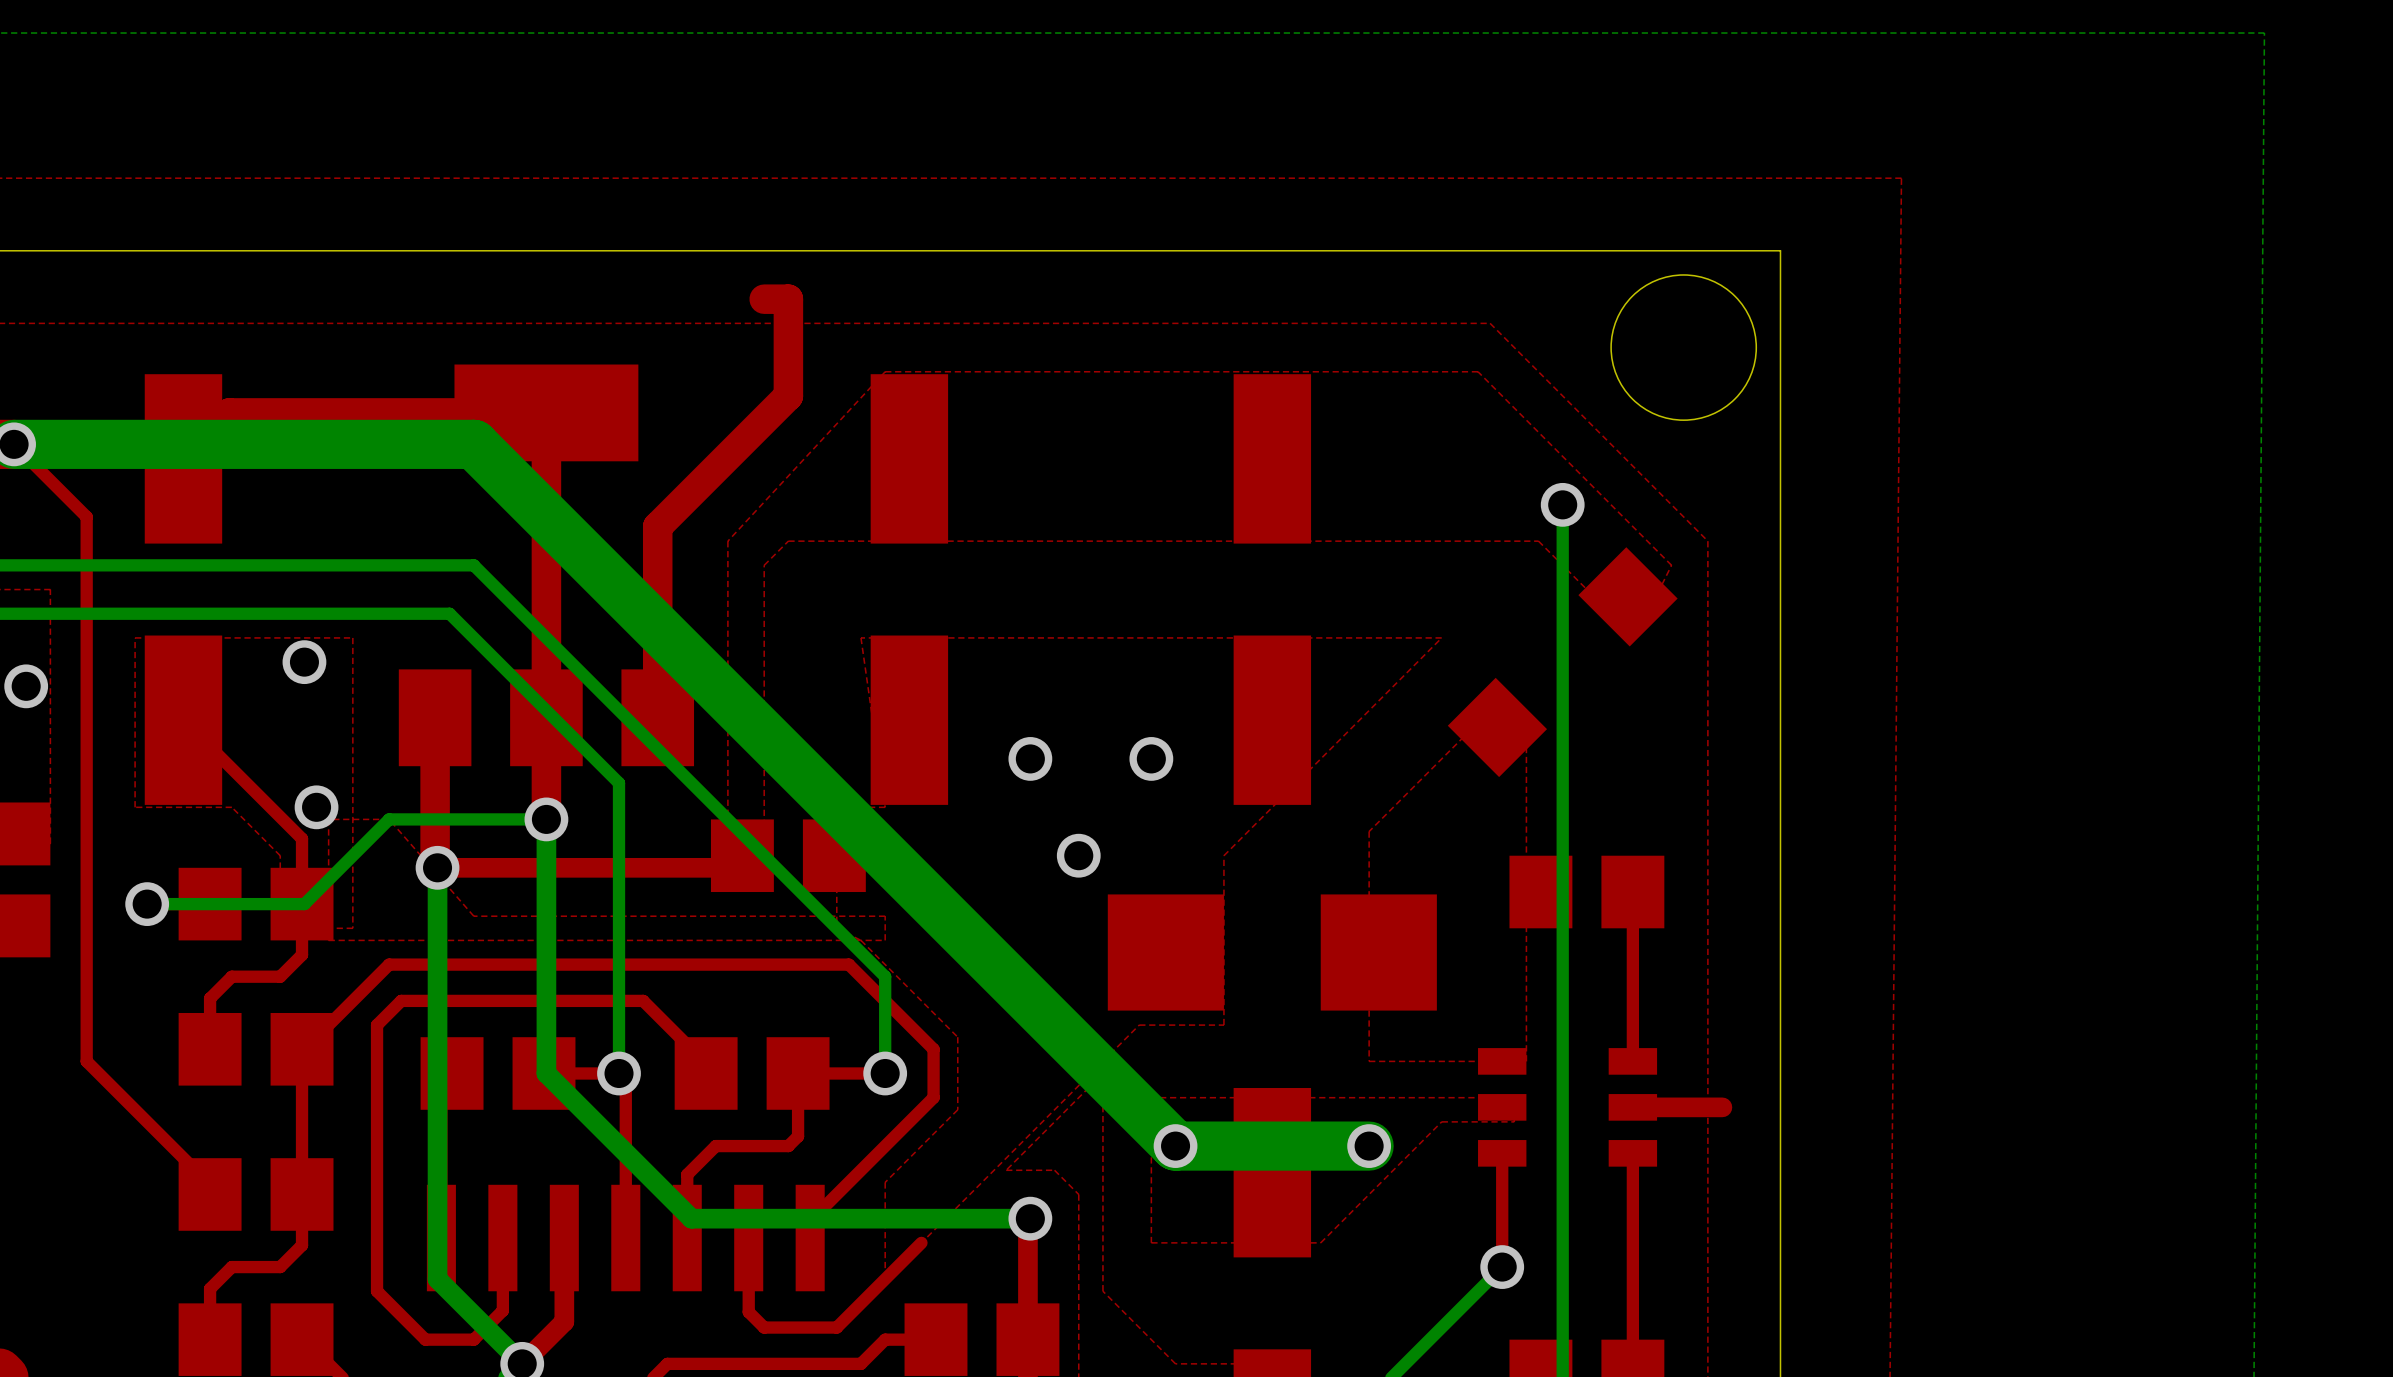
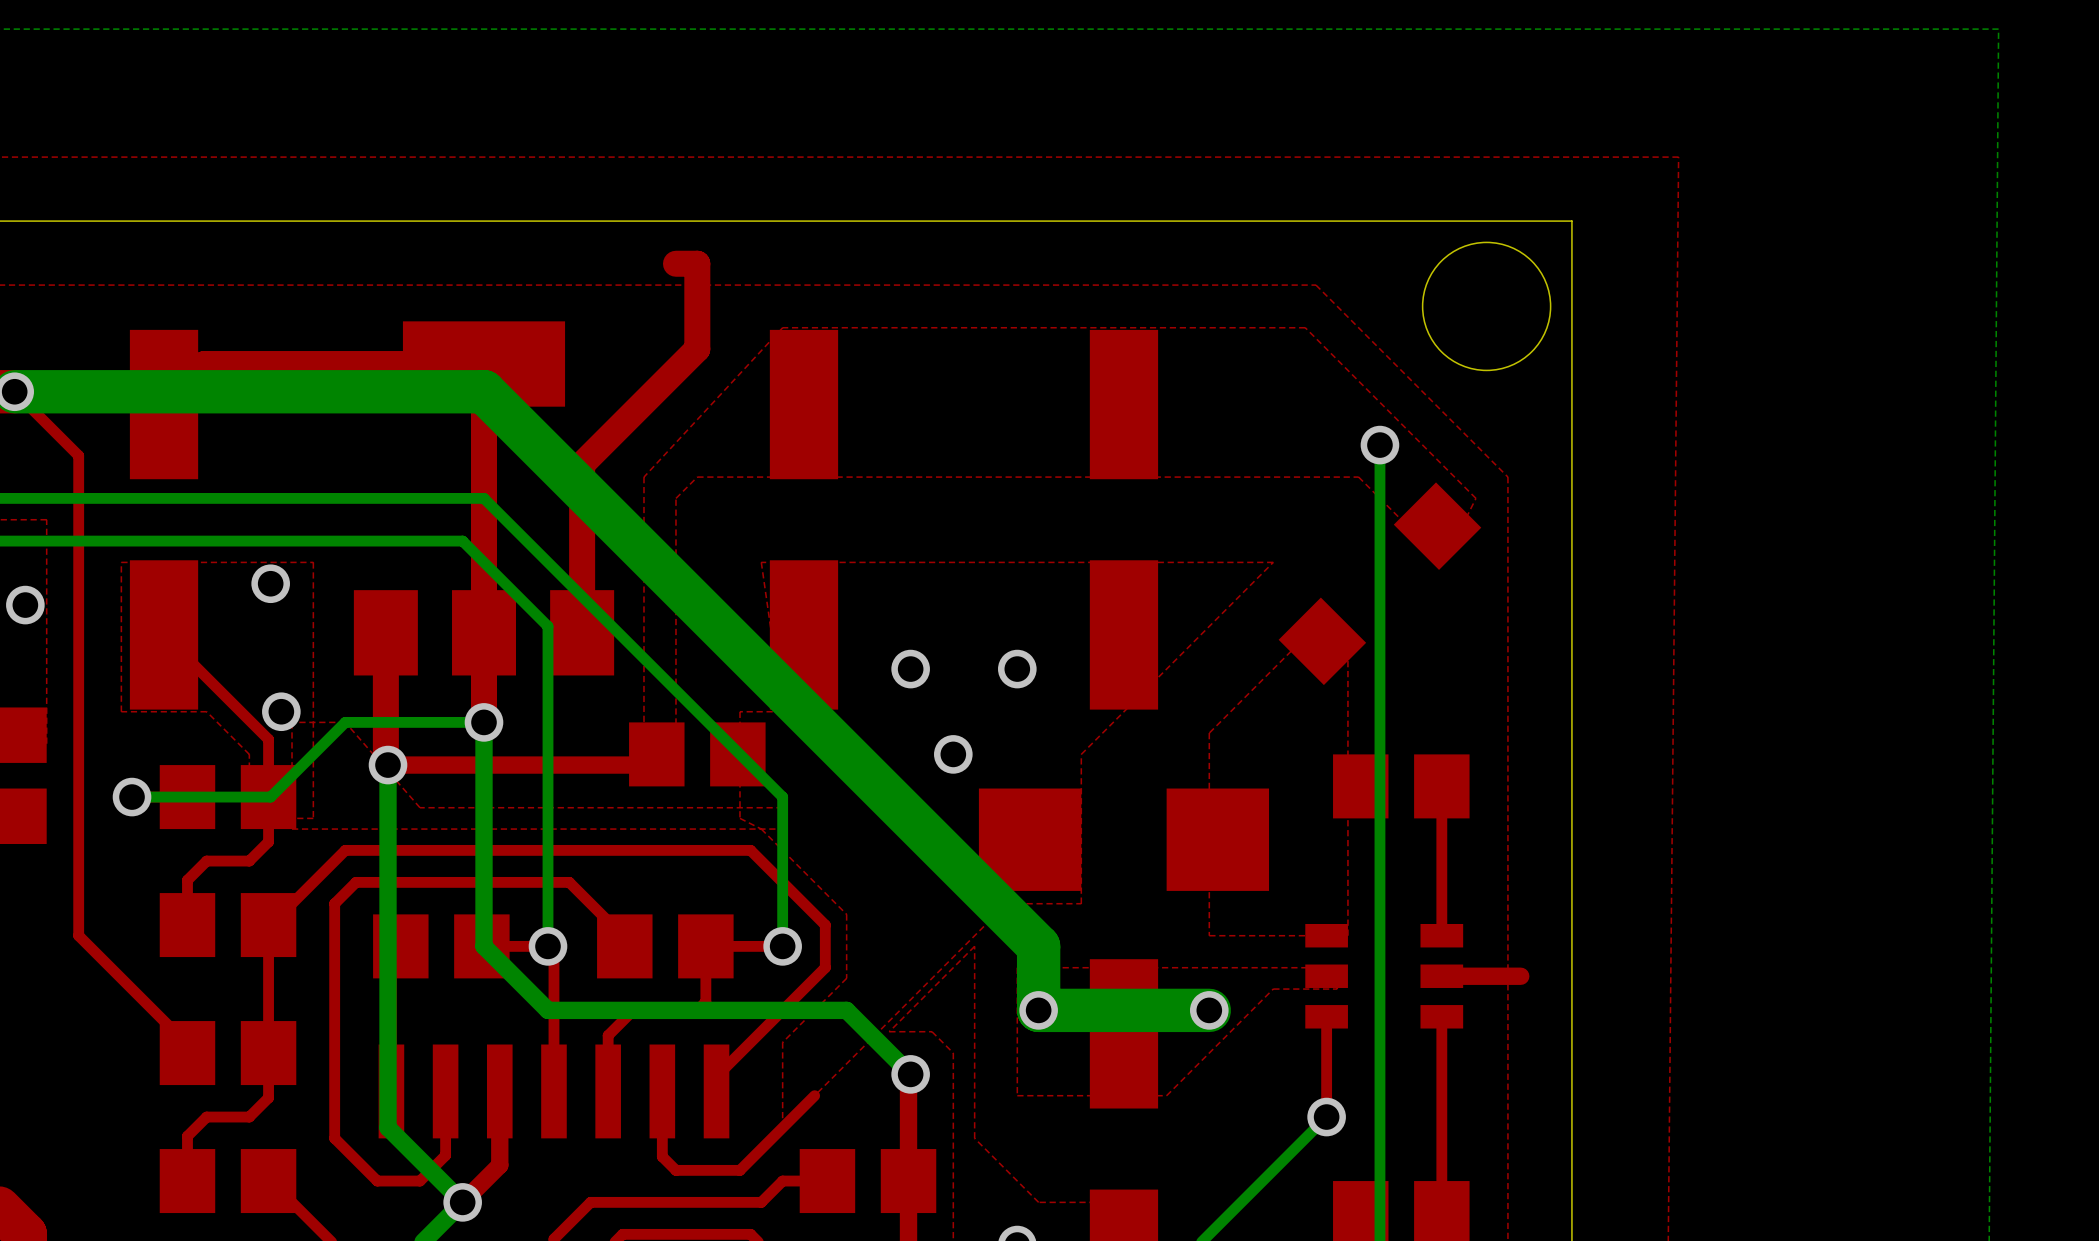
bottom track: (473, 444) (1175, 1146) -> (420, 391) (484, 391) (1038, 946) (1038, 1010)
bottom track: (473, 565) (522, 613) -> (398, 541) (462, 541)
bottom track: (449, 613) (619, 783) -> (548, 626) (548, 690)
bottom track: (619, 710) (885, 976) -> (420, 498) (484, 498) (782, 797) (782, 861)
bottom track: (619, 1146) (691, 1218) (1030, 1218) -> (548, 1010) (846, 1010) (910, 1074)

